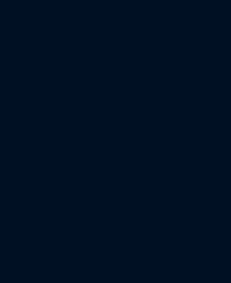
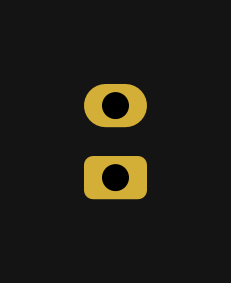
part: none -> (115, 141)

